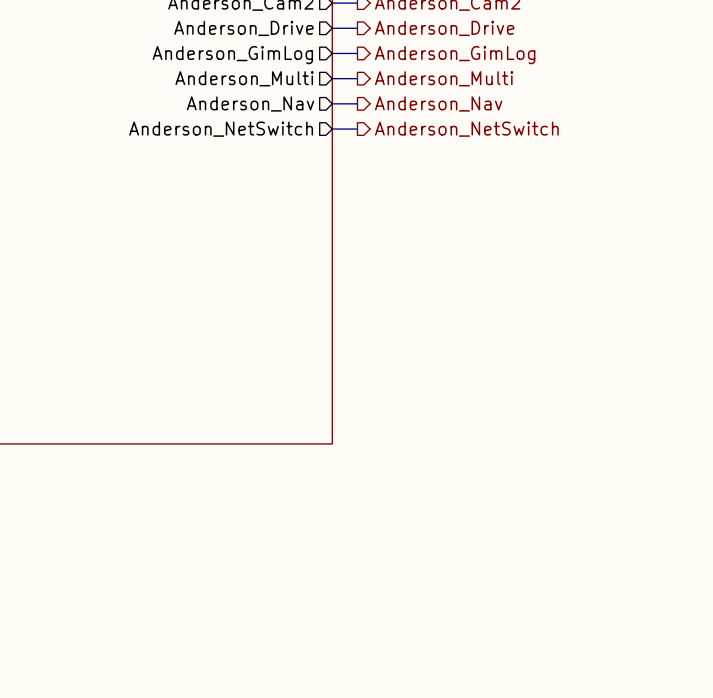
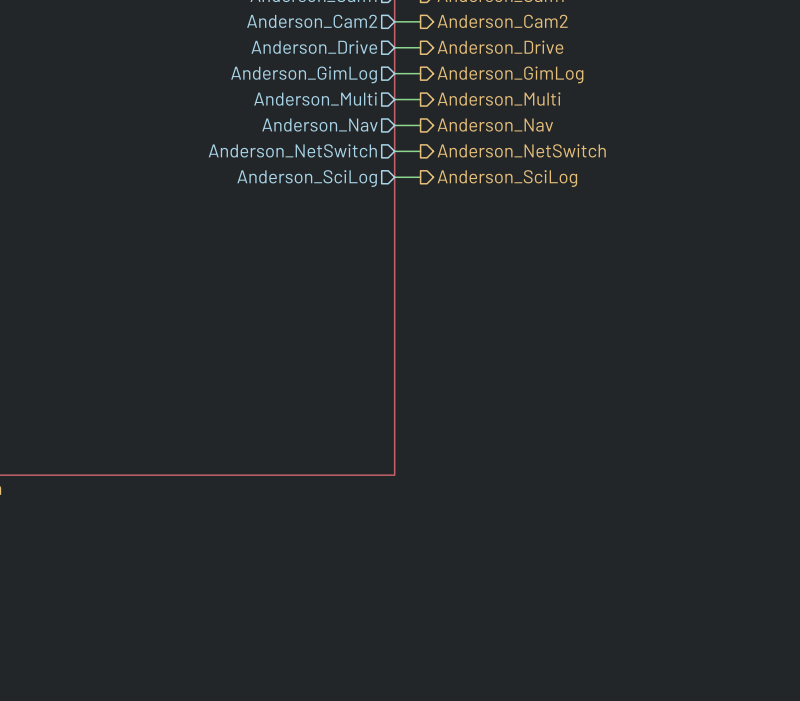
wire: none -> (394, 177) (420, 177)
sheet pin: none -> Anderson_SciLog (307, 178)
hierarchical label: none -> Anderson_SciLog (507, 178)

